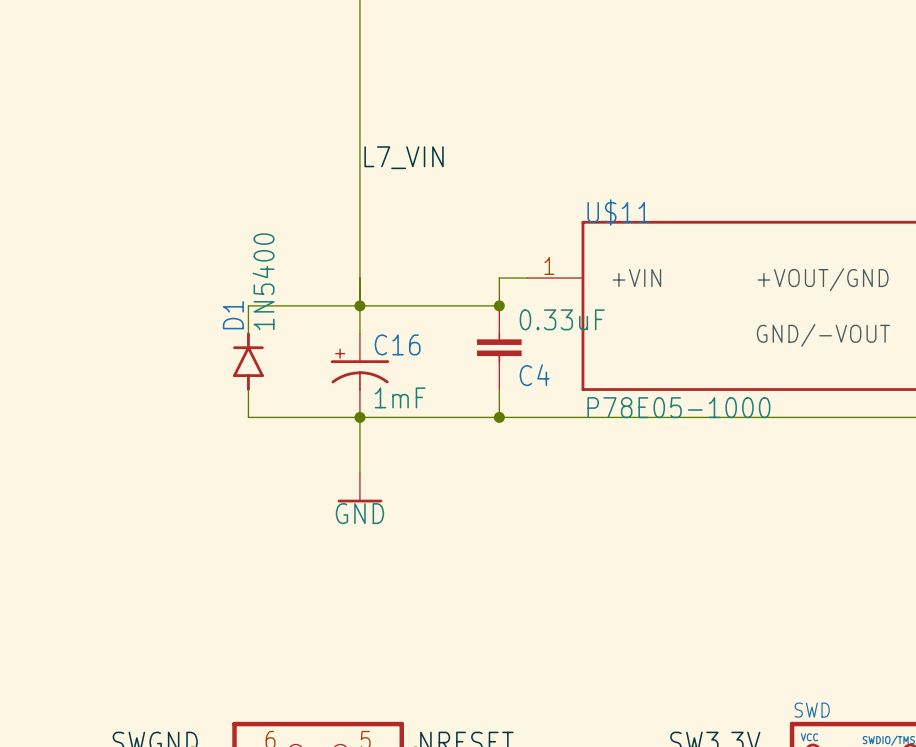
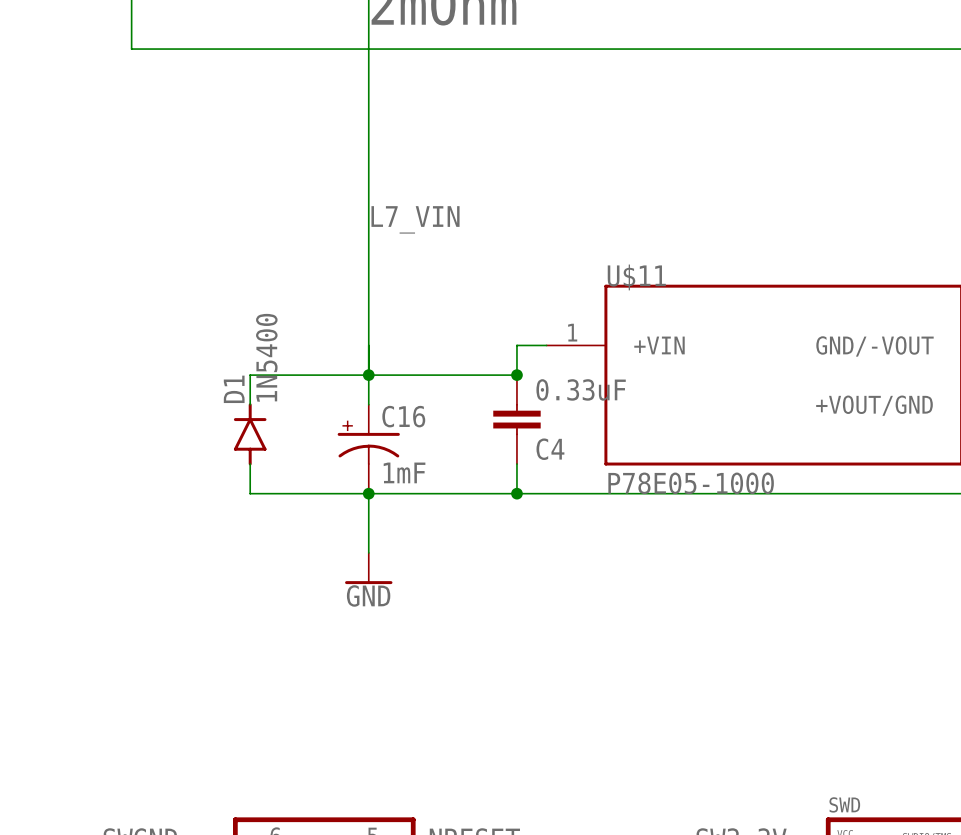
U$11 pin name: +VOUT/GND (823, 279) -> GND/-VOUT (875, 346)
U$11 pin name: GND/-VOUT (823, 335) -> +VOUT/GND (874, 405)

